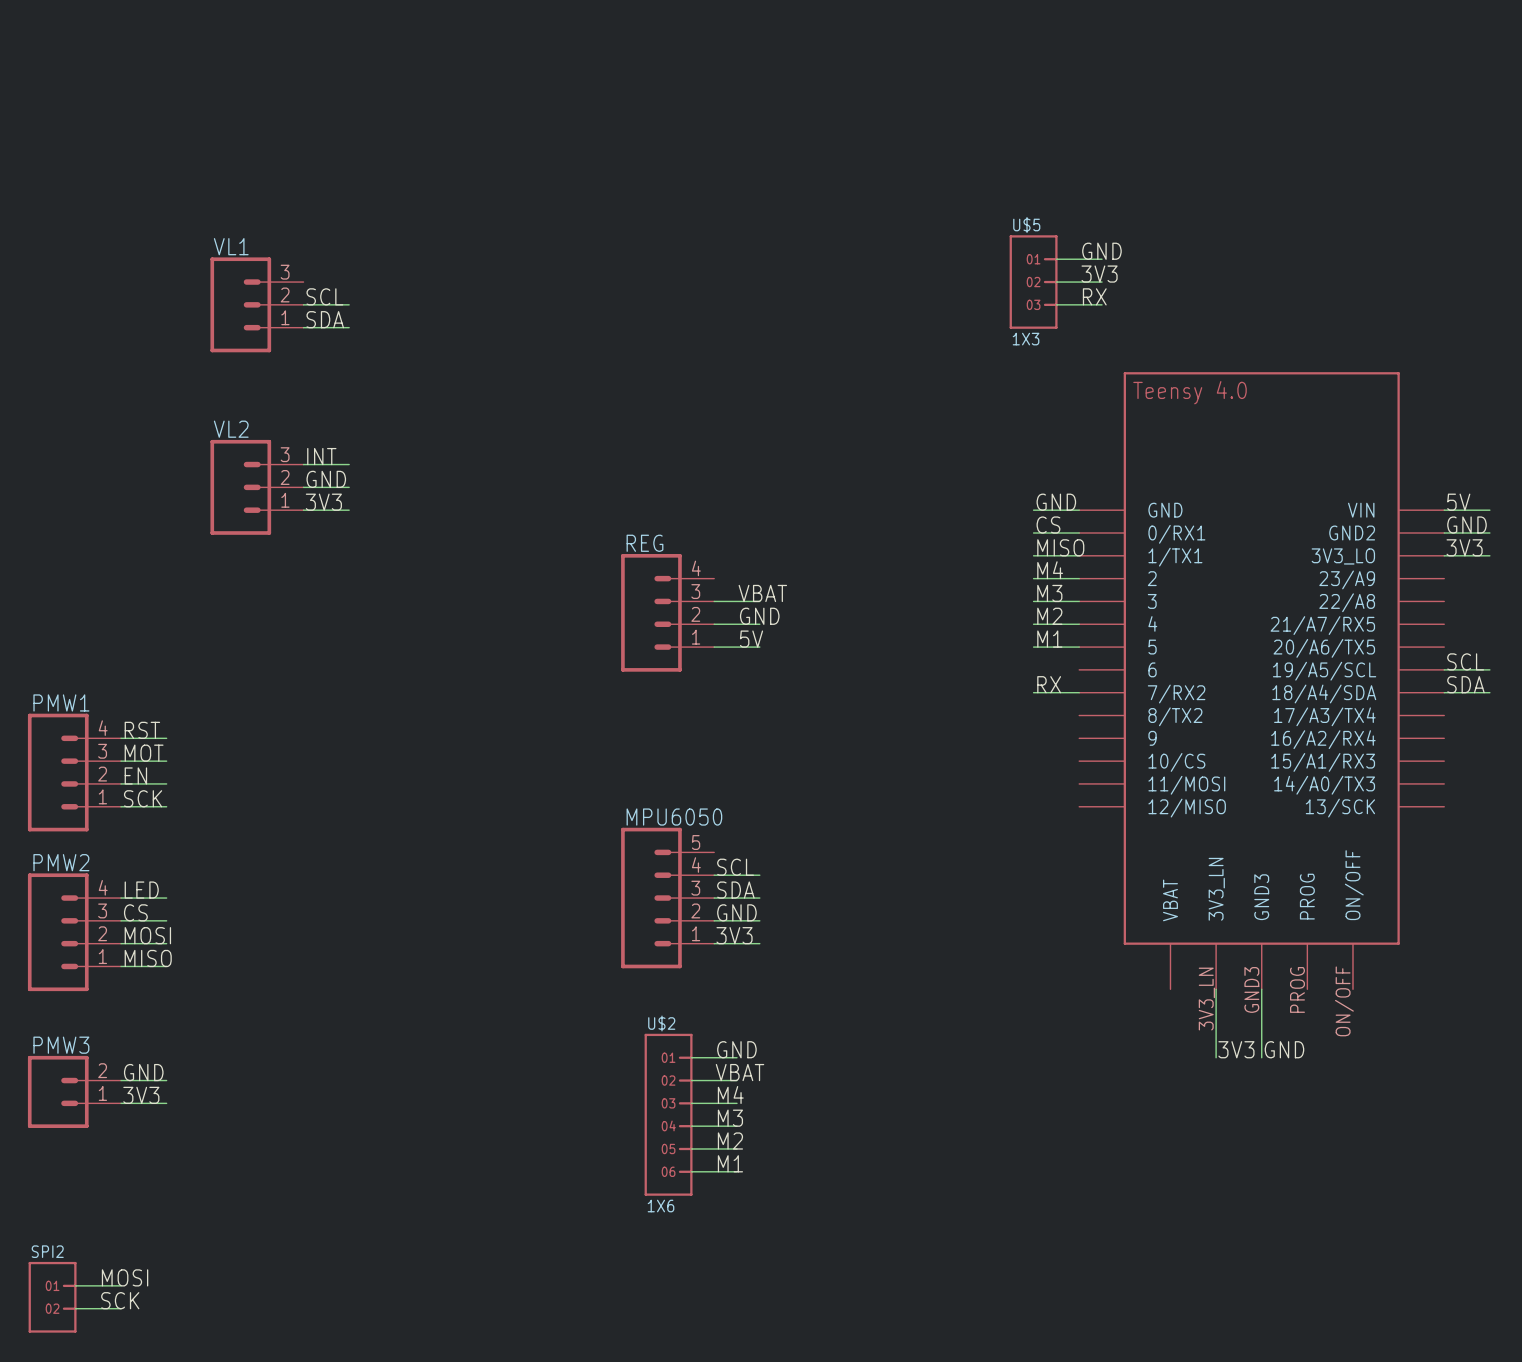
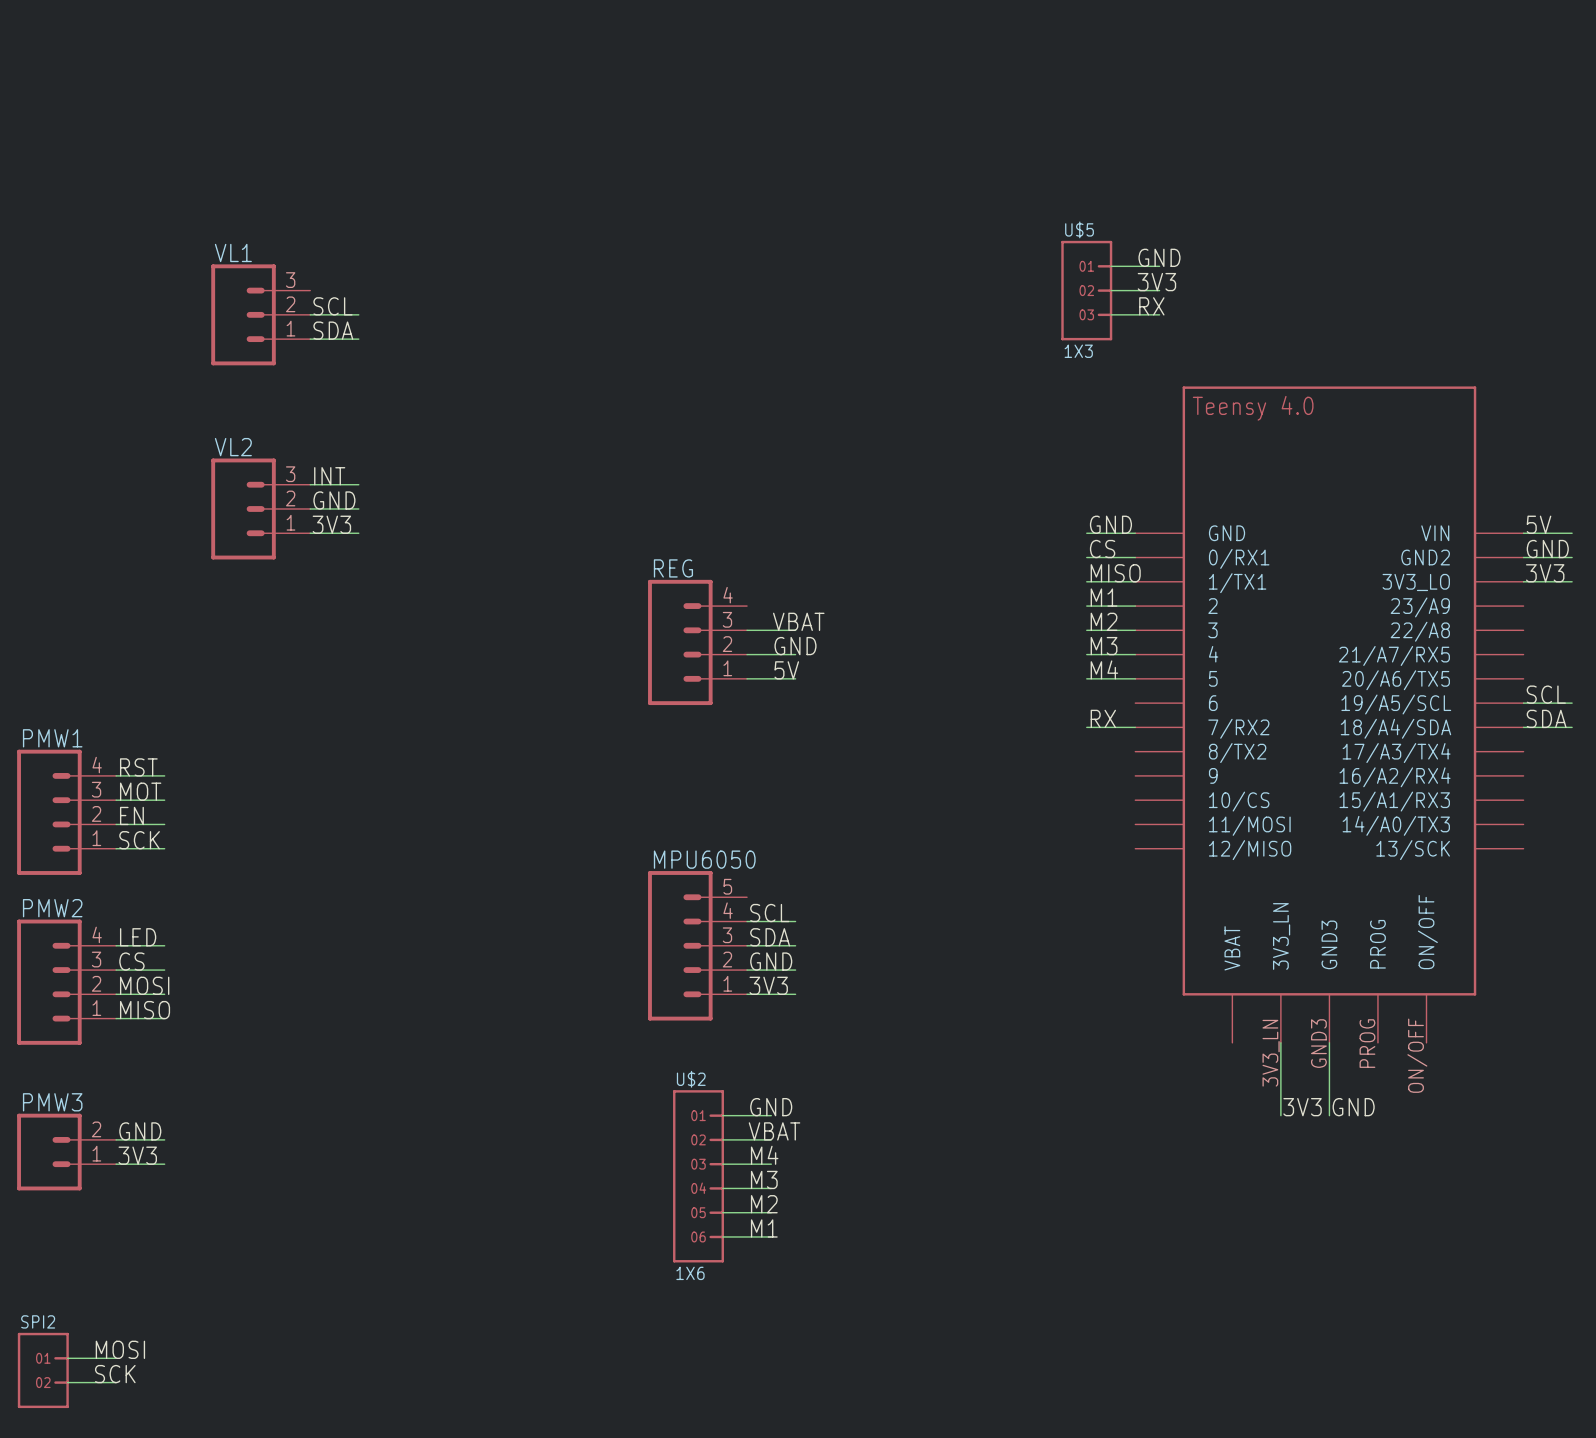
label: M4 (1050, 570) -> M1 (1104, 597)
label: M3 (1049, 593) -> M2 (1104, 621)
label: M2 (1049, 616) -> M3 (1104, 646)
label: M1 (1049, 639) -> M4 (1104, 669)

